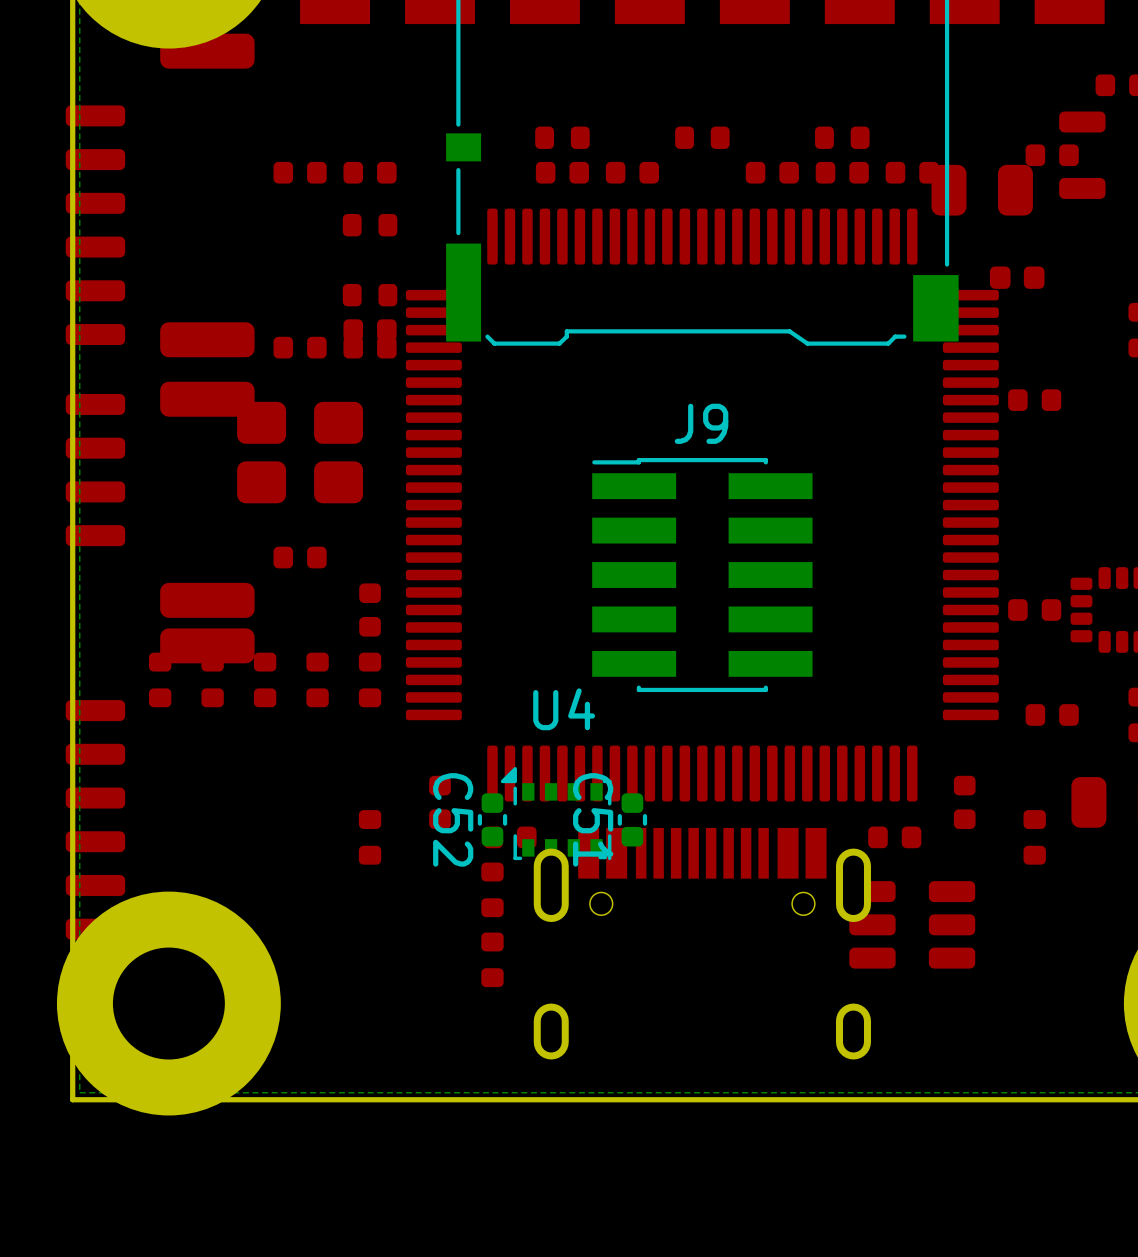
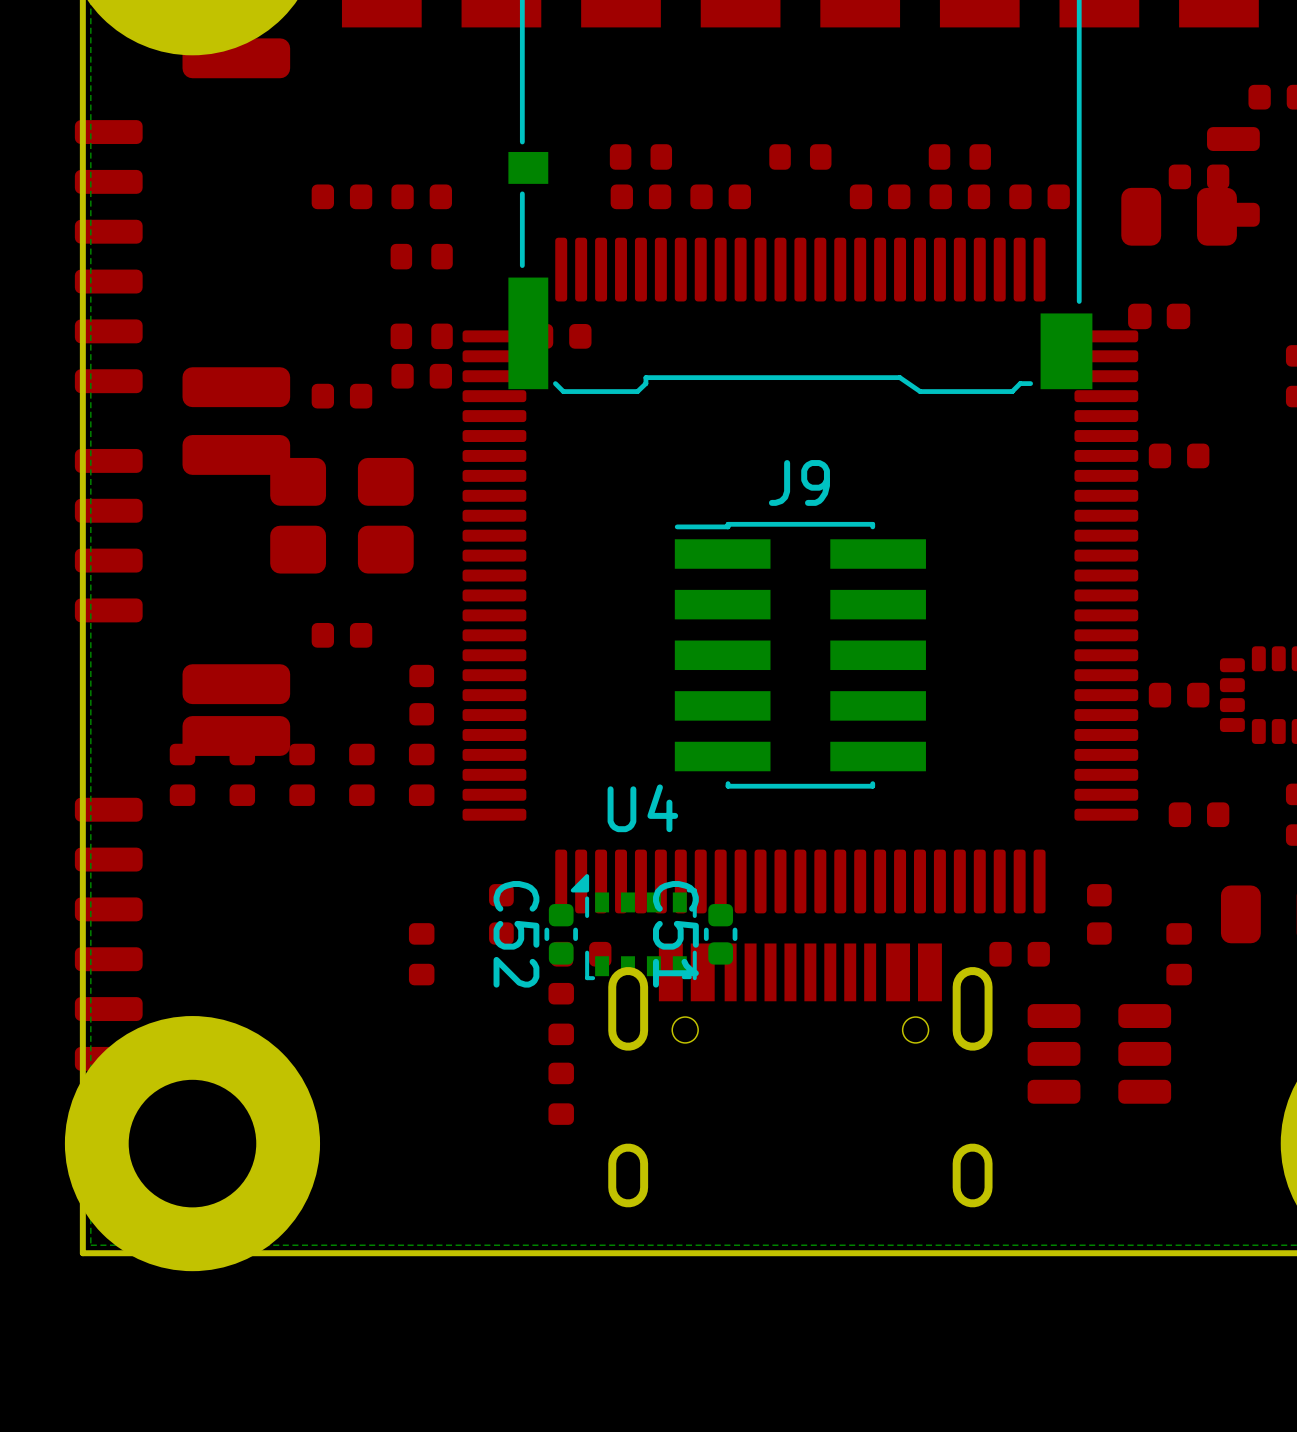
part position: (982, 190) -> (1179, 216)
part position: (370, 347) -> (561, 336)
part position: (912, 924) -> (1099, 1053)

